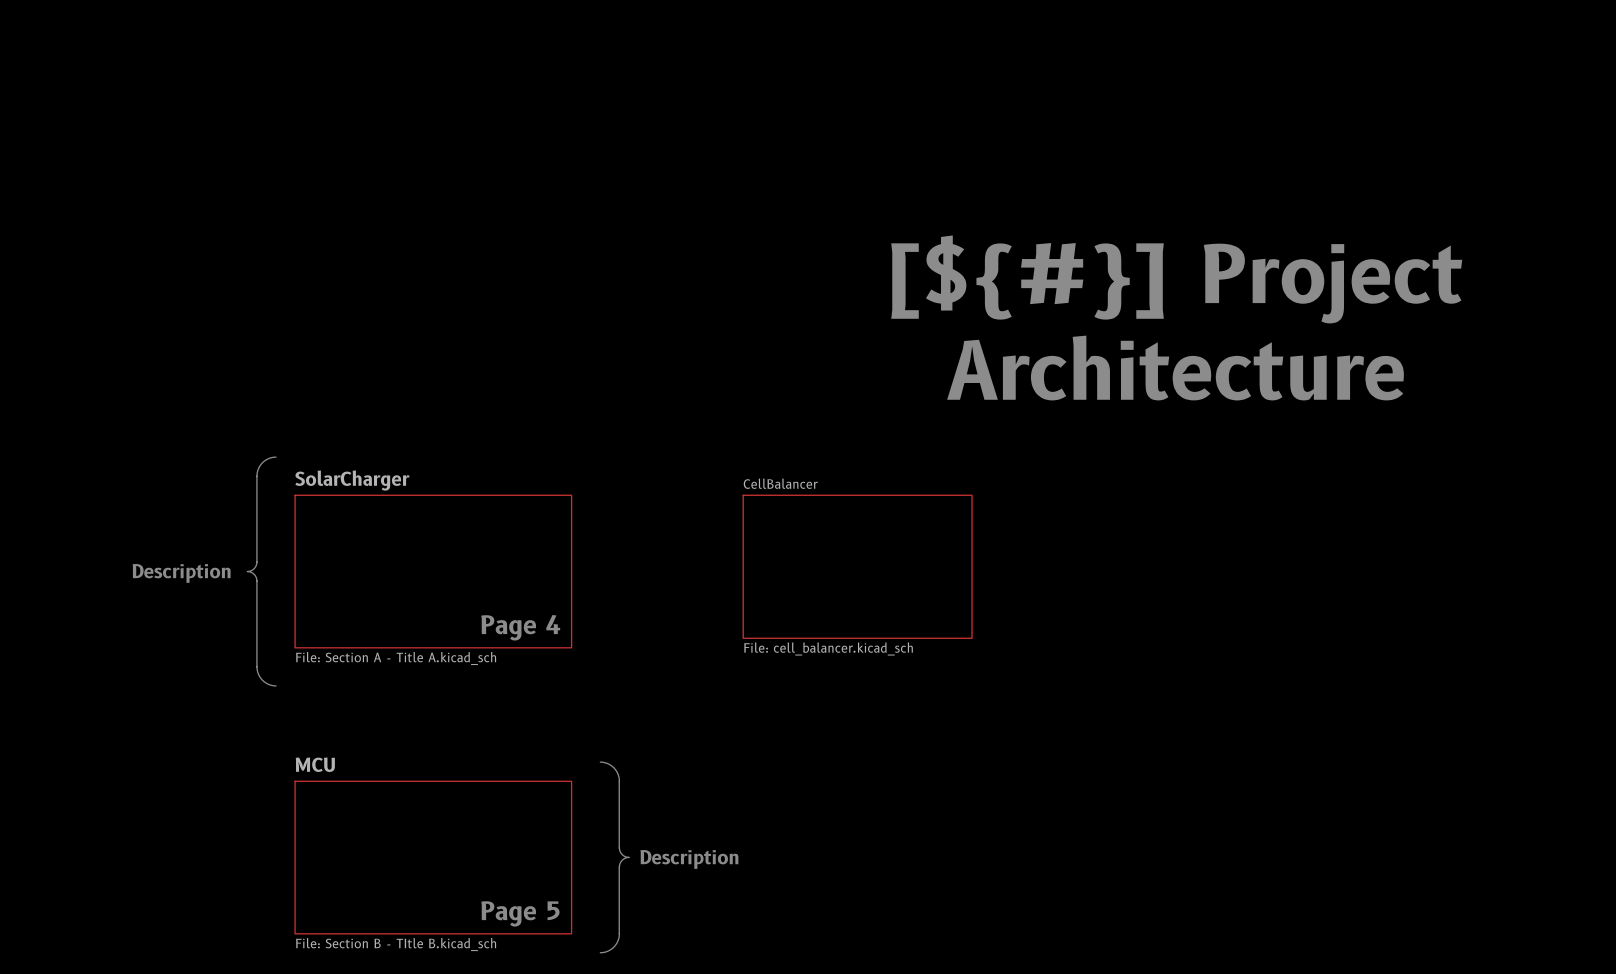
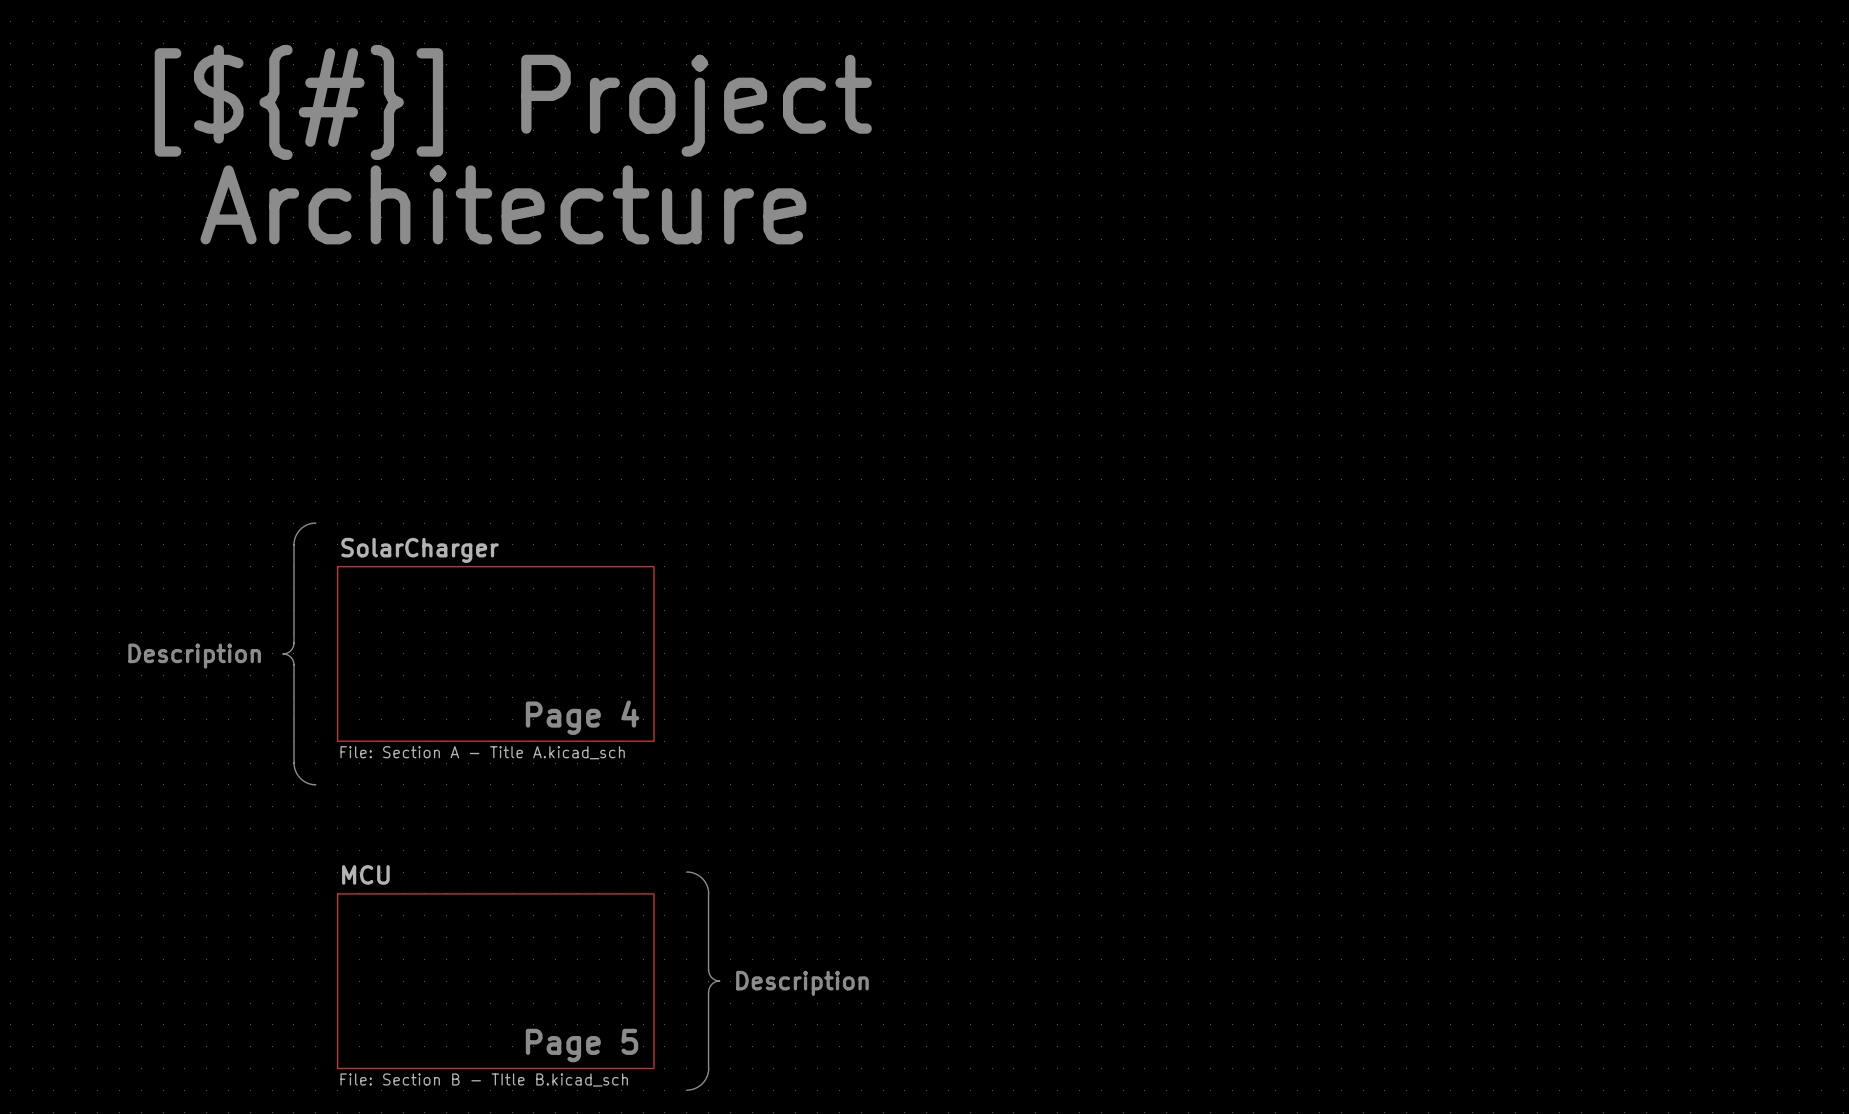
text: none -> [${#}] Project (513, 102)
text: none -> Architecture (503, 204)
text: [${#}] Project (1176, 279) -> none
text: Architecture (1175, 368) -> none
sheet CellBalancer: File: cell_balancer.kicad_sch (857, 566) -> none

